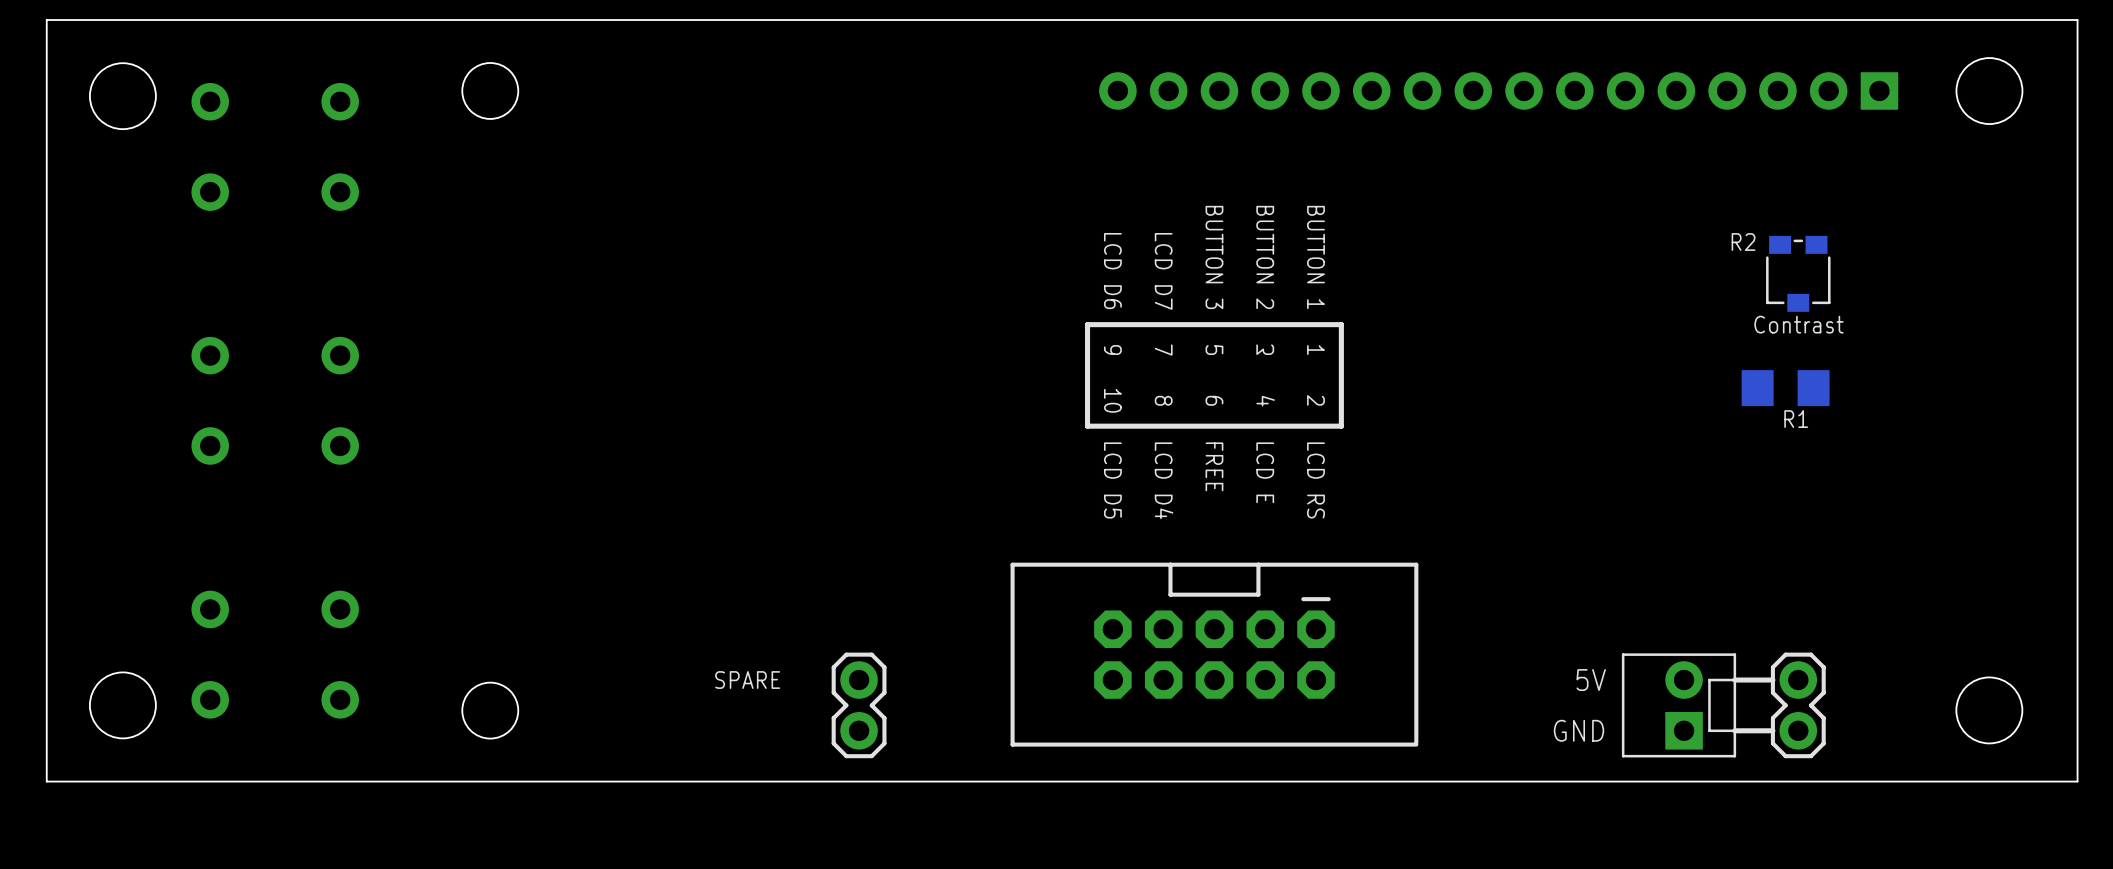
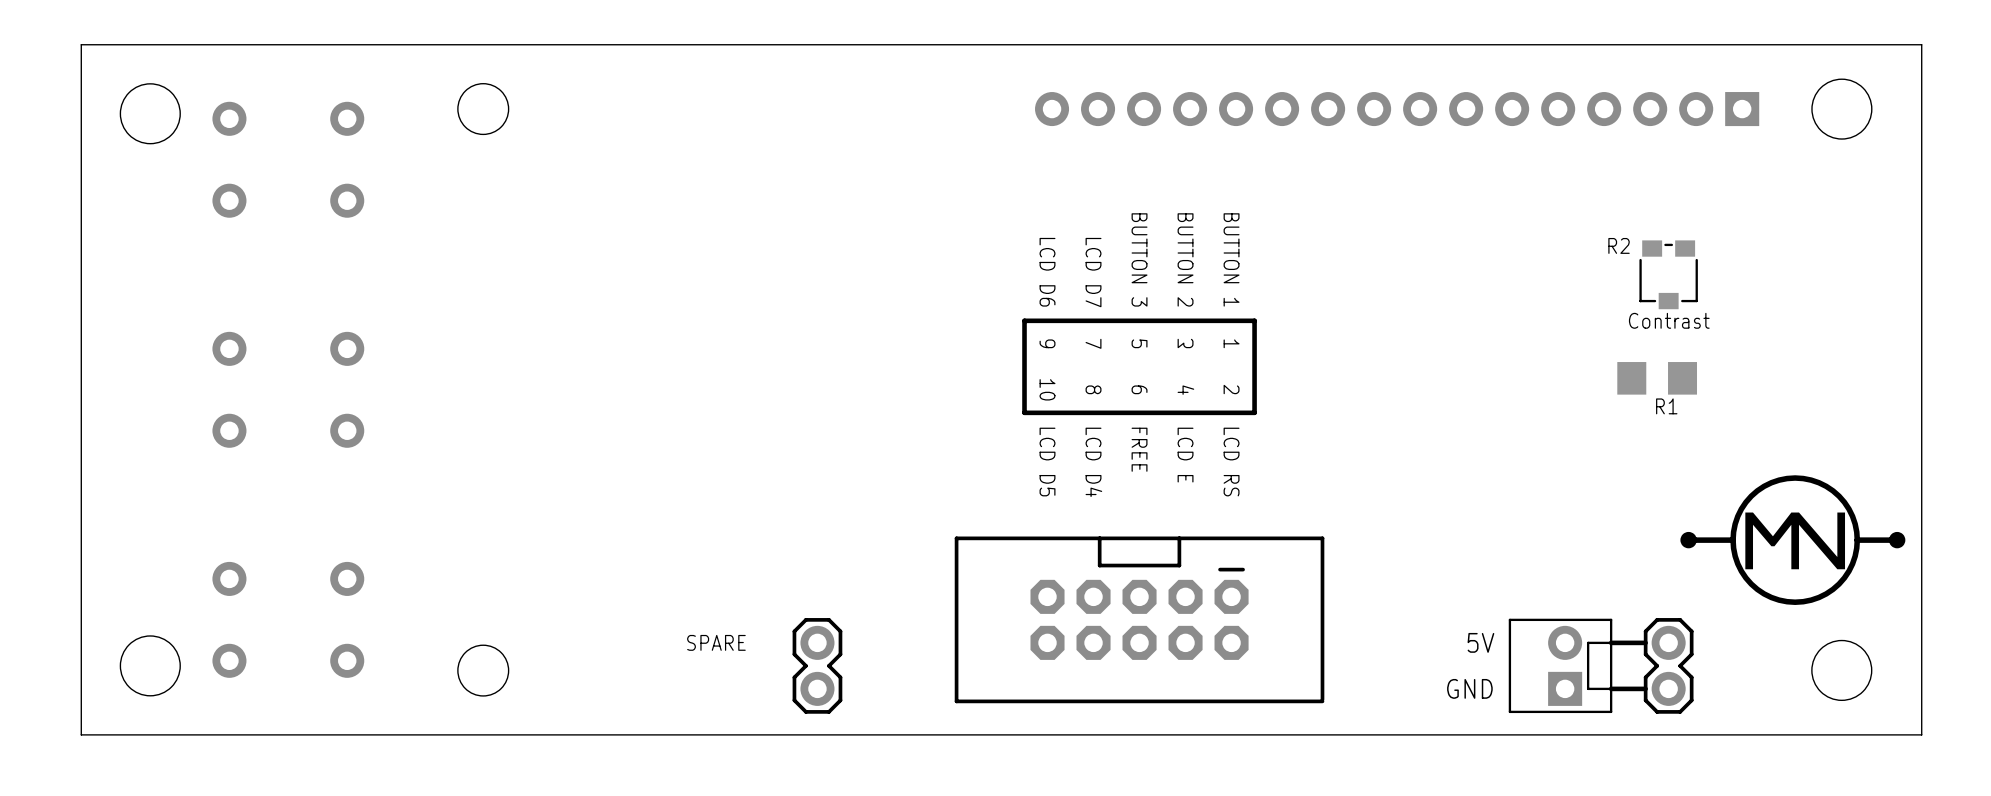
drawing: none -> [1680, 475, 1906, 605]

